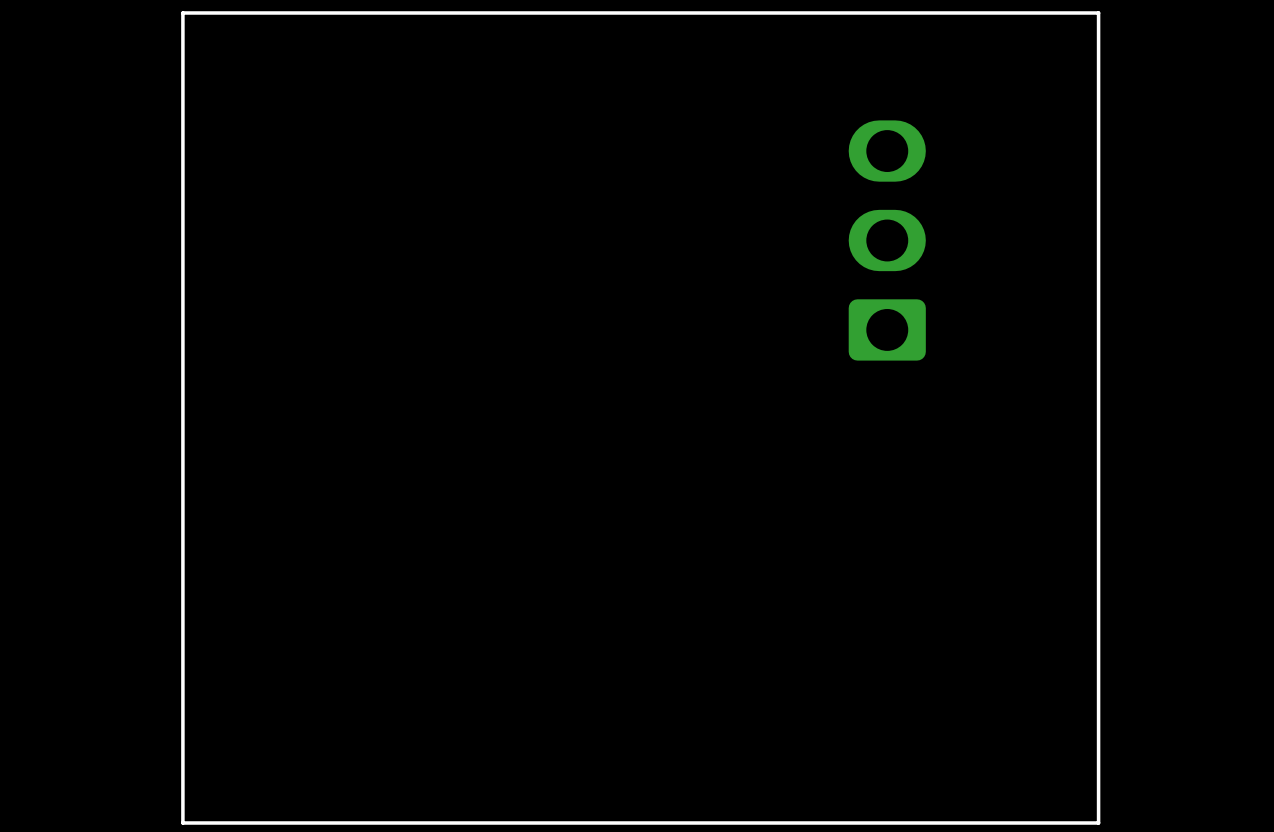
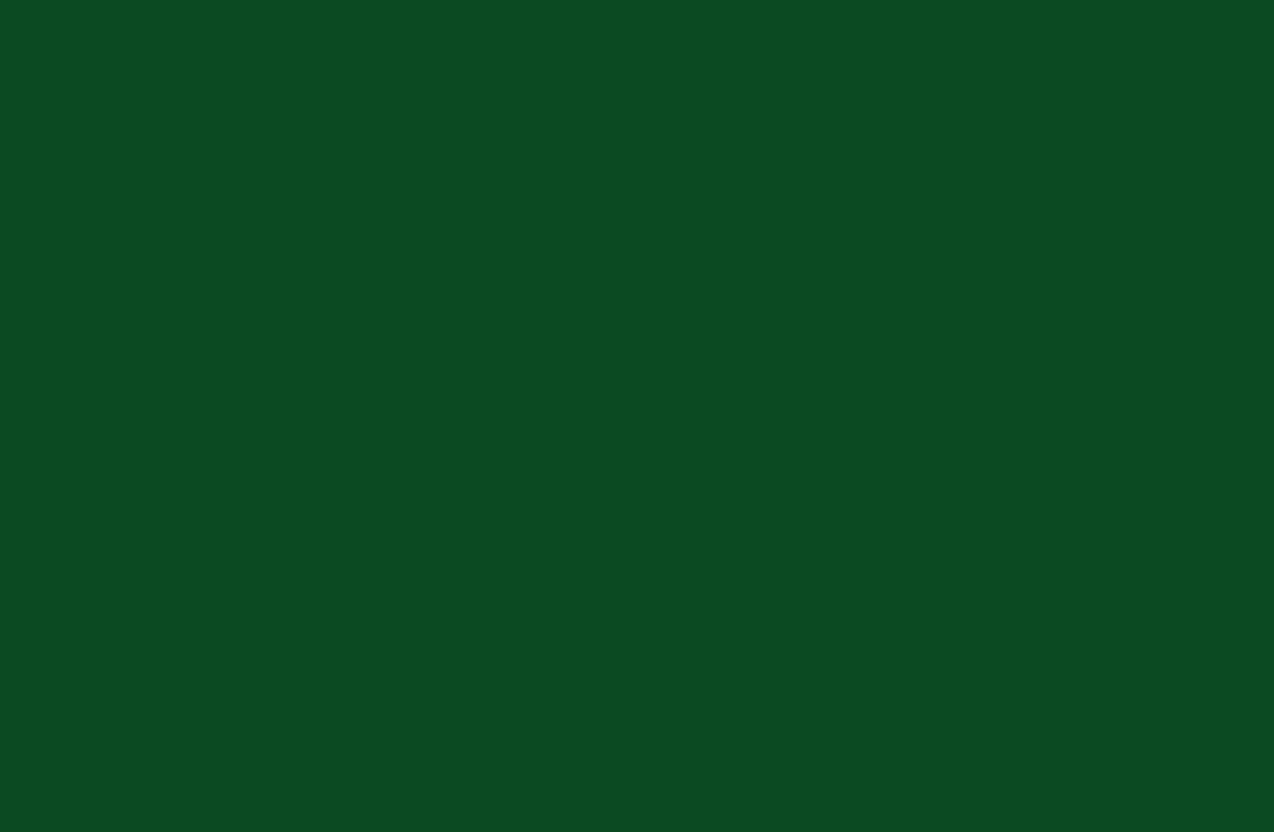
board edge: (1098, 12) (182, 12) (182, 823) (1098, 823) (1098, 12) -> none
part: (887, 240) -> none

